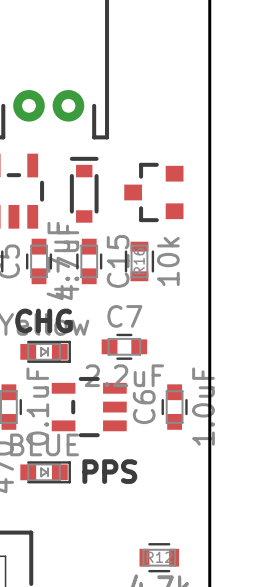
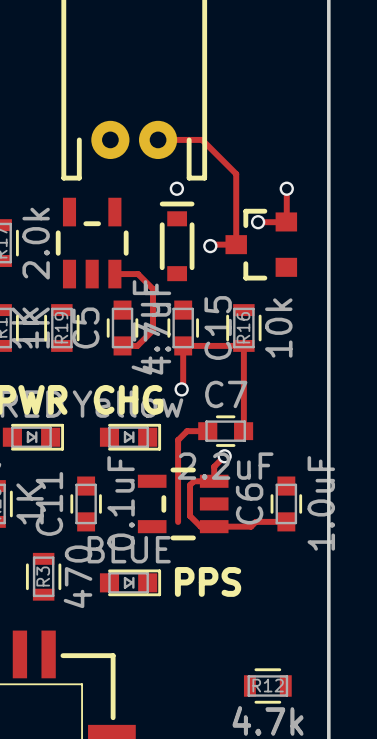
track: none -> (158, 139) (202, 139) (236, 174) (236, 244) (210, 246)
via: none -> (176, 188)
track: none -> (286, 188) (286, 221) (258, 222)
via: none -> (286, 188)
via: none -> (258, 222)
via: none -> (210, 246)
track: none -> (114, 274) (138, 274) (153, 289) (153, 330) (137, 345) (122, 345)
track: none -> (181, 389) (183, 345) (243, 345) (243, 430)
via: none -> (181, 389)
track: none -> (202, 431) (187, 431) (178, 440)
track: none -> (178, 439) (178, 521)
track: none -> (224, 456) (214, 466) (214, 481) (193, 481) (190, 485) (190, 516) (200, 526) (251, 526) (255, 521) (286, 521)
via: none -> (224, 456)

